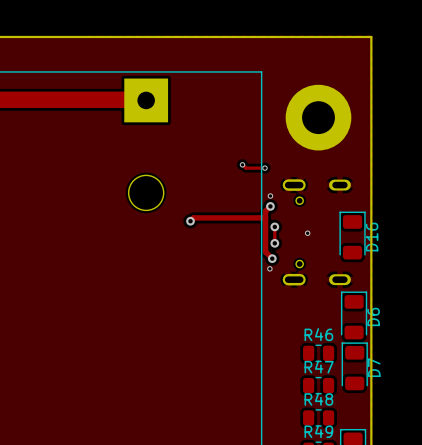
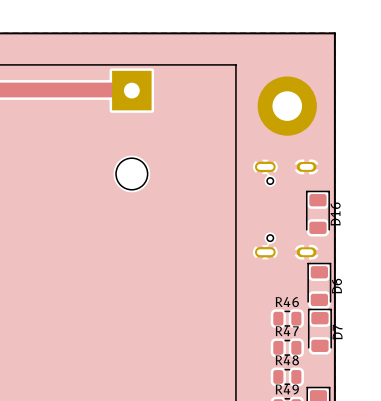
track: (242, 164) (245, 168) (264, 168) -> none
via: (242, 164) -> none
via: (264, 168) -> none
via: (270, 196) -> none
track: (270, 206) (265, 211) (265, 251) (272, 258) -> none
via: (270, 206) -> none
track: (265, 217) (193, 217) (190, 221) -> none
via: (190, 221) -> none
track: (274, 226) (274, 243) -> none
via: (274, 226) -> none
via: (307, 233) -> none
via: (274, 243) -> none
via: (272, 258) -> none
via: (269, 268) -> none

